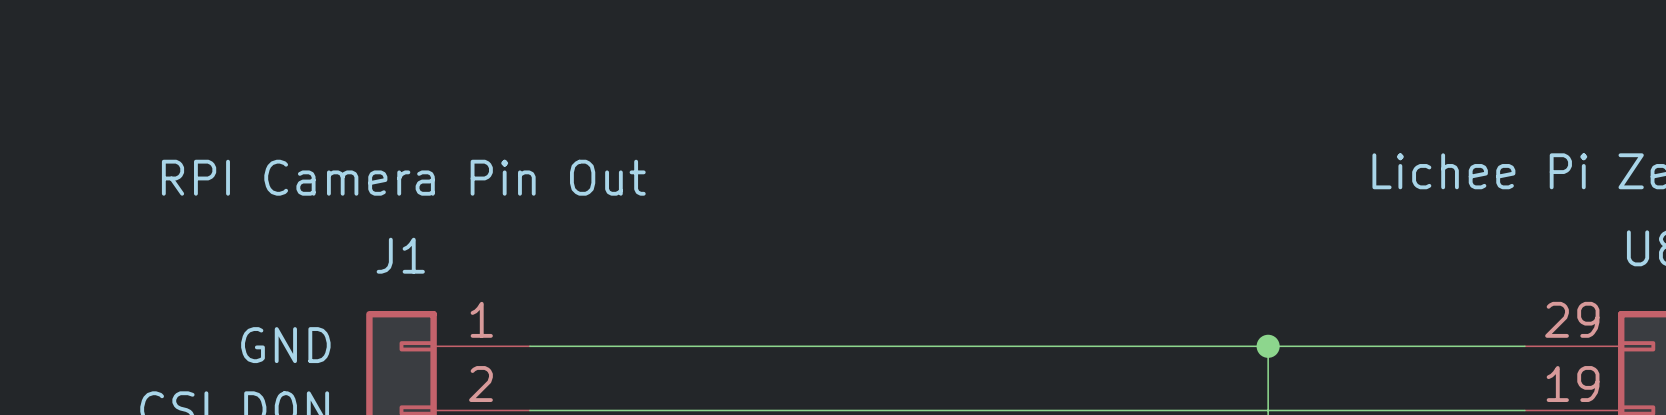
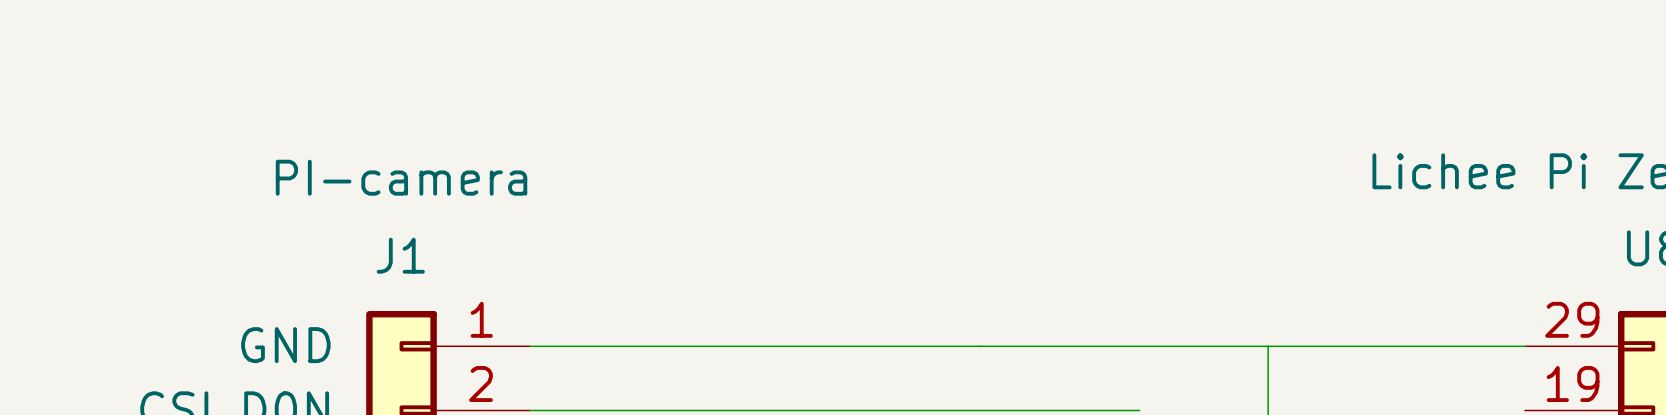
J1 value: RPI Camera Pin Out (403, 177) -> PI-camera (401, 177)
junction: (1268, 346) -> none
wire: (1139, 410) (1524, 410) -> none

